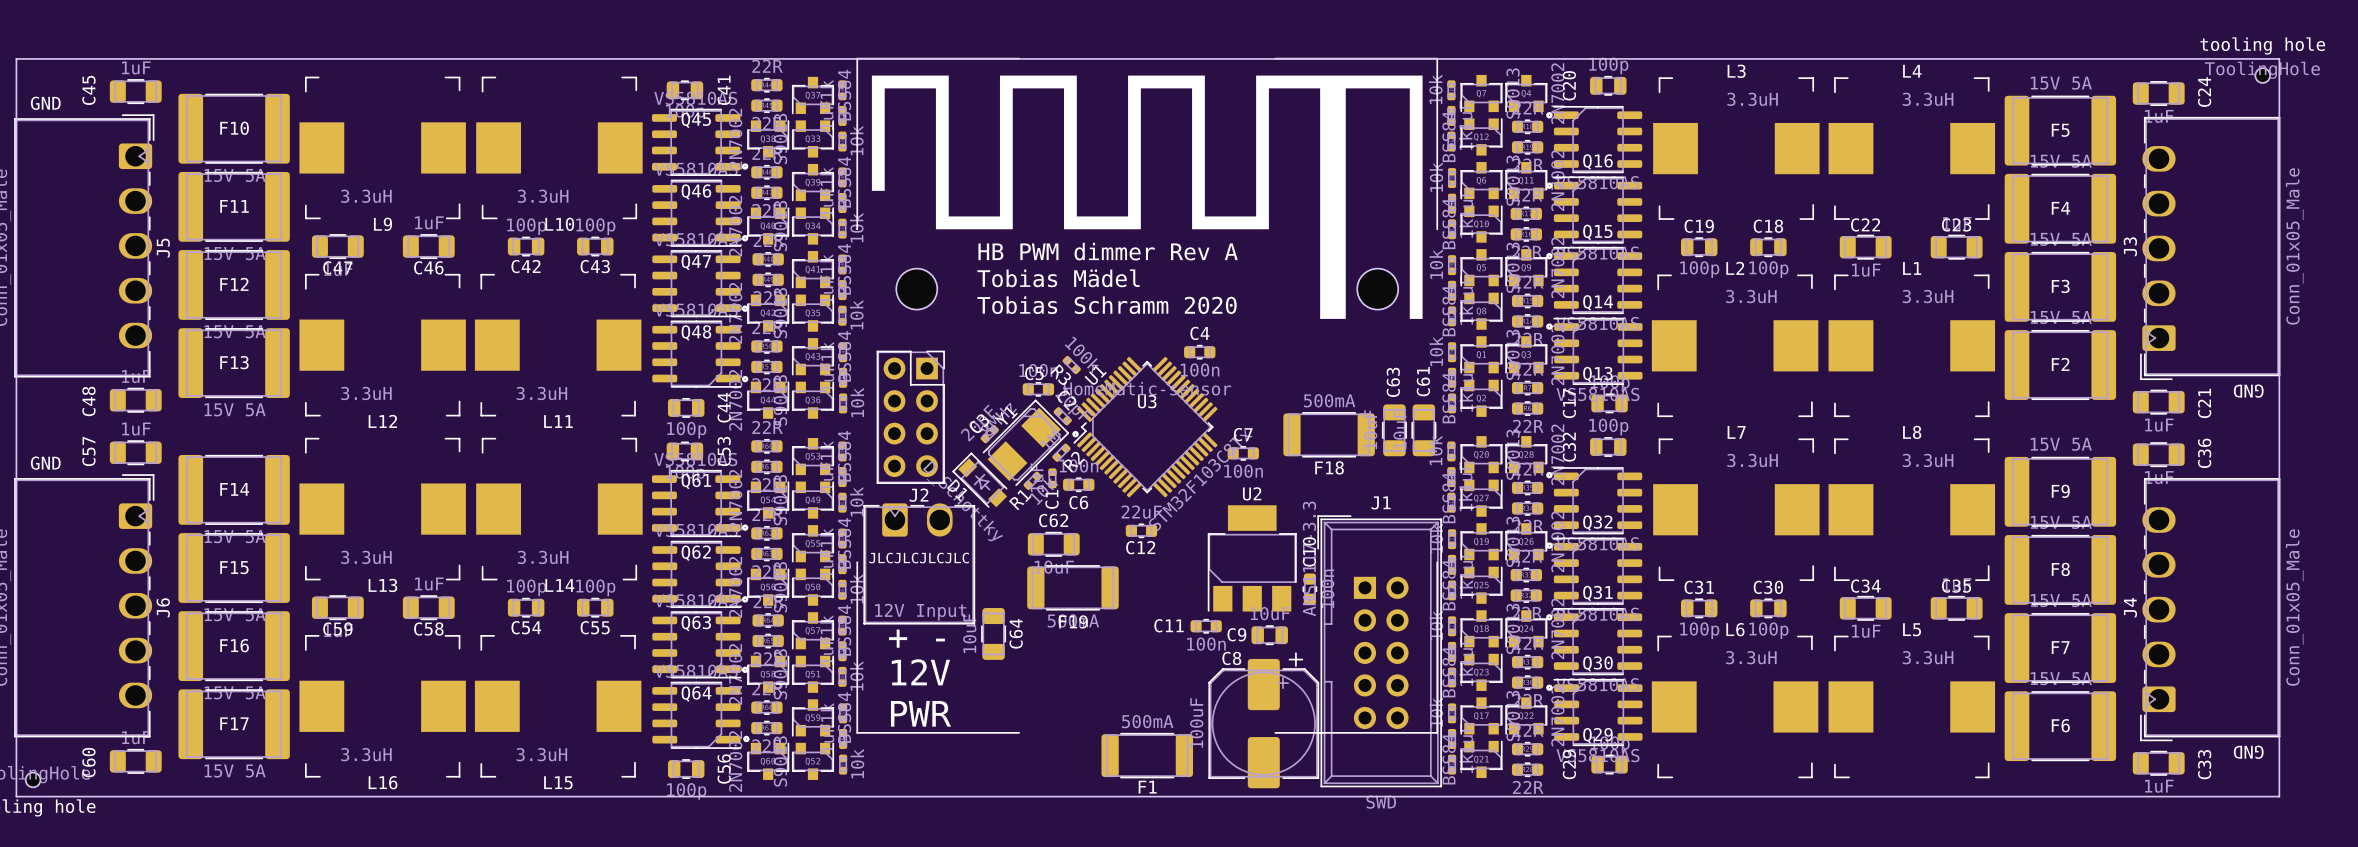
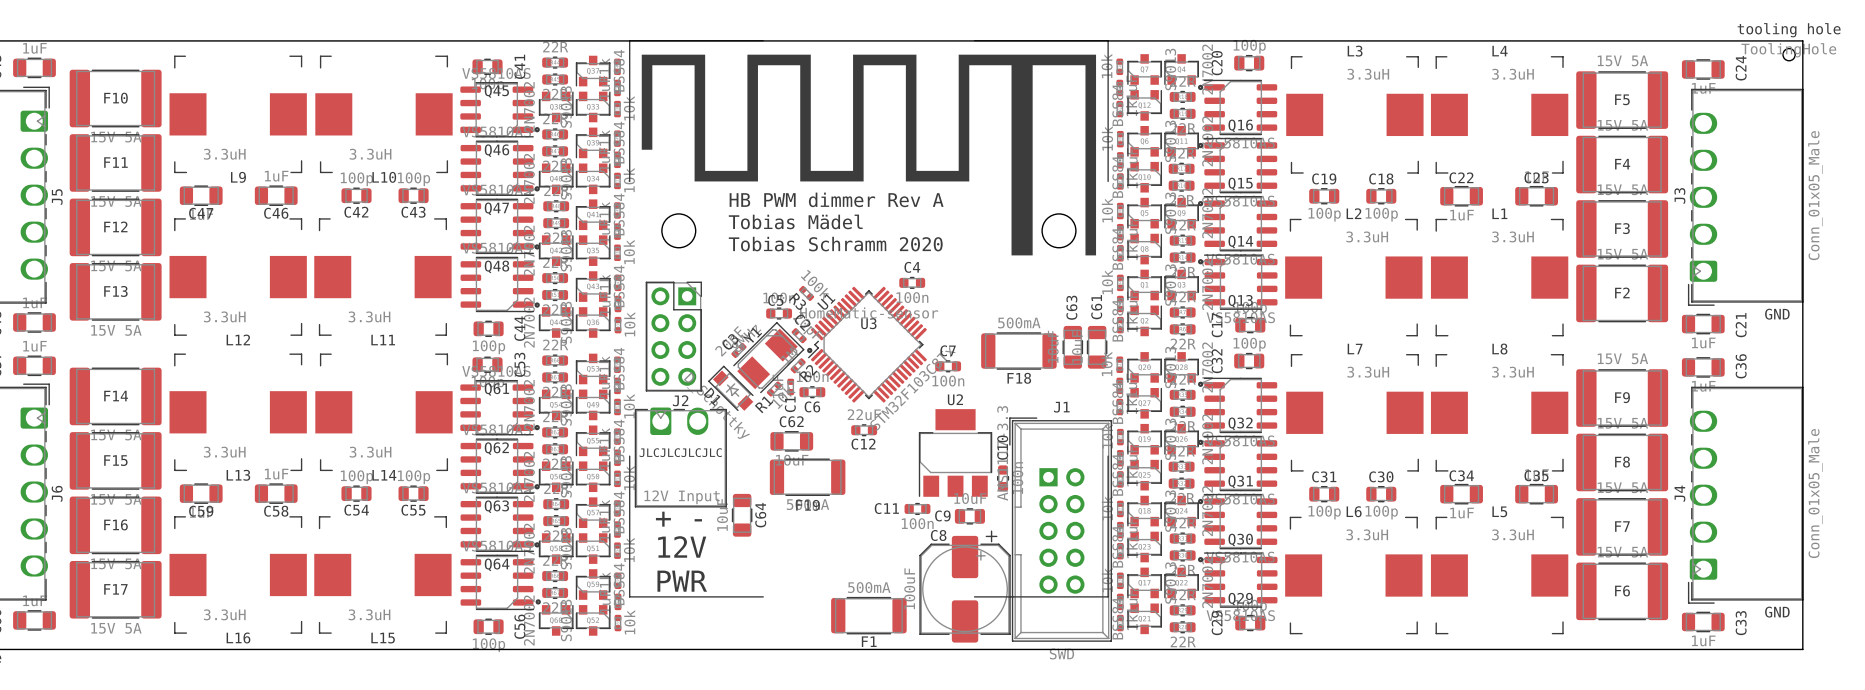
text rotation: 0° (2248, 391) -> 180° (1777, 314)
text rotation: 0° (2248, 752) -> 180° (1777, 612)

